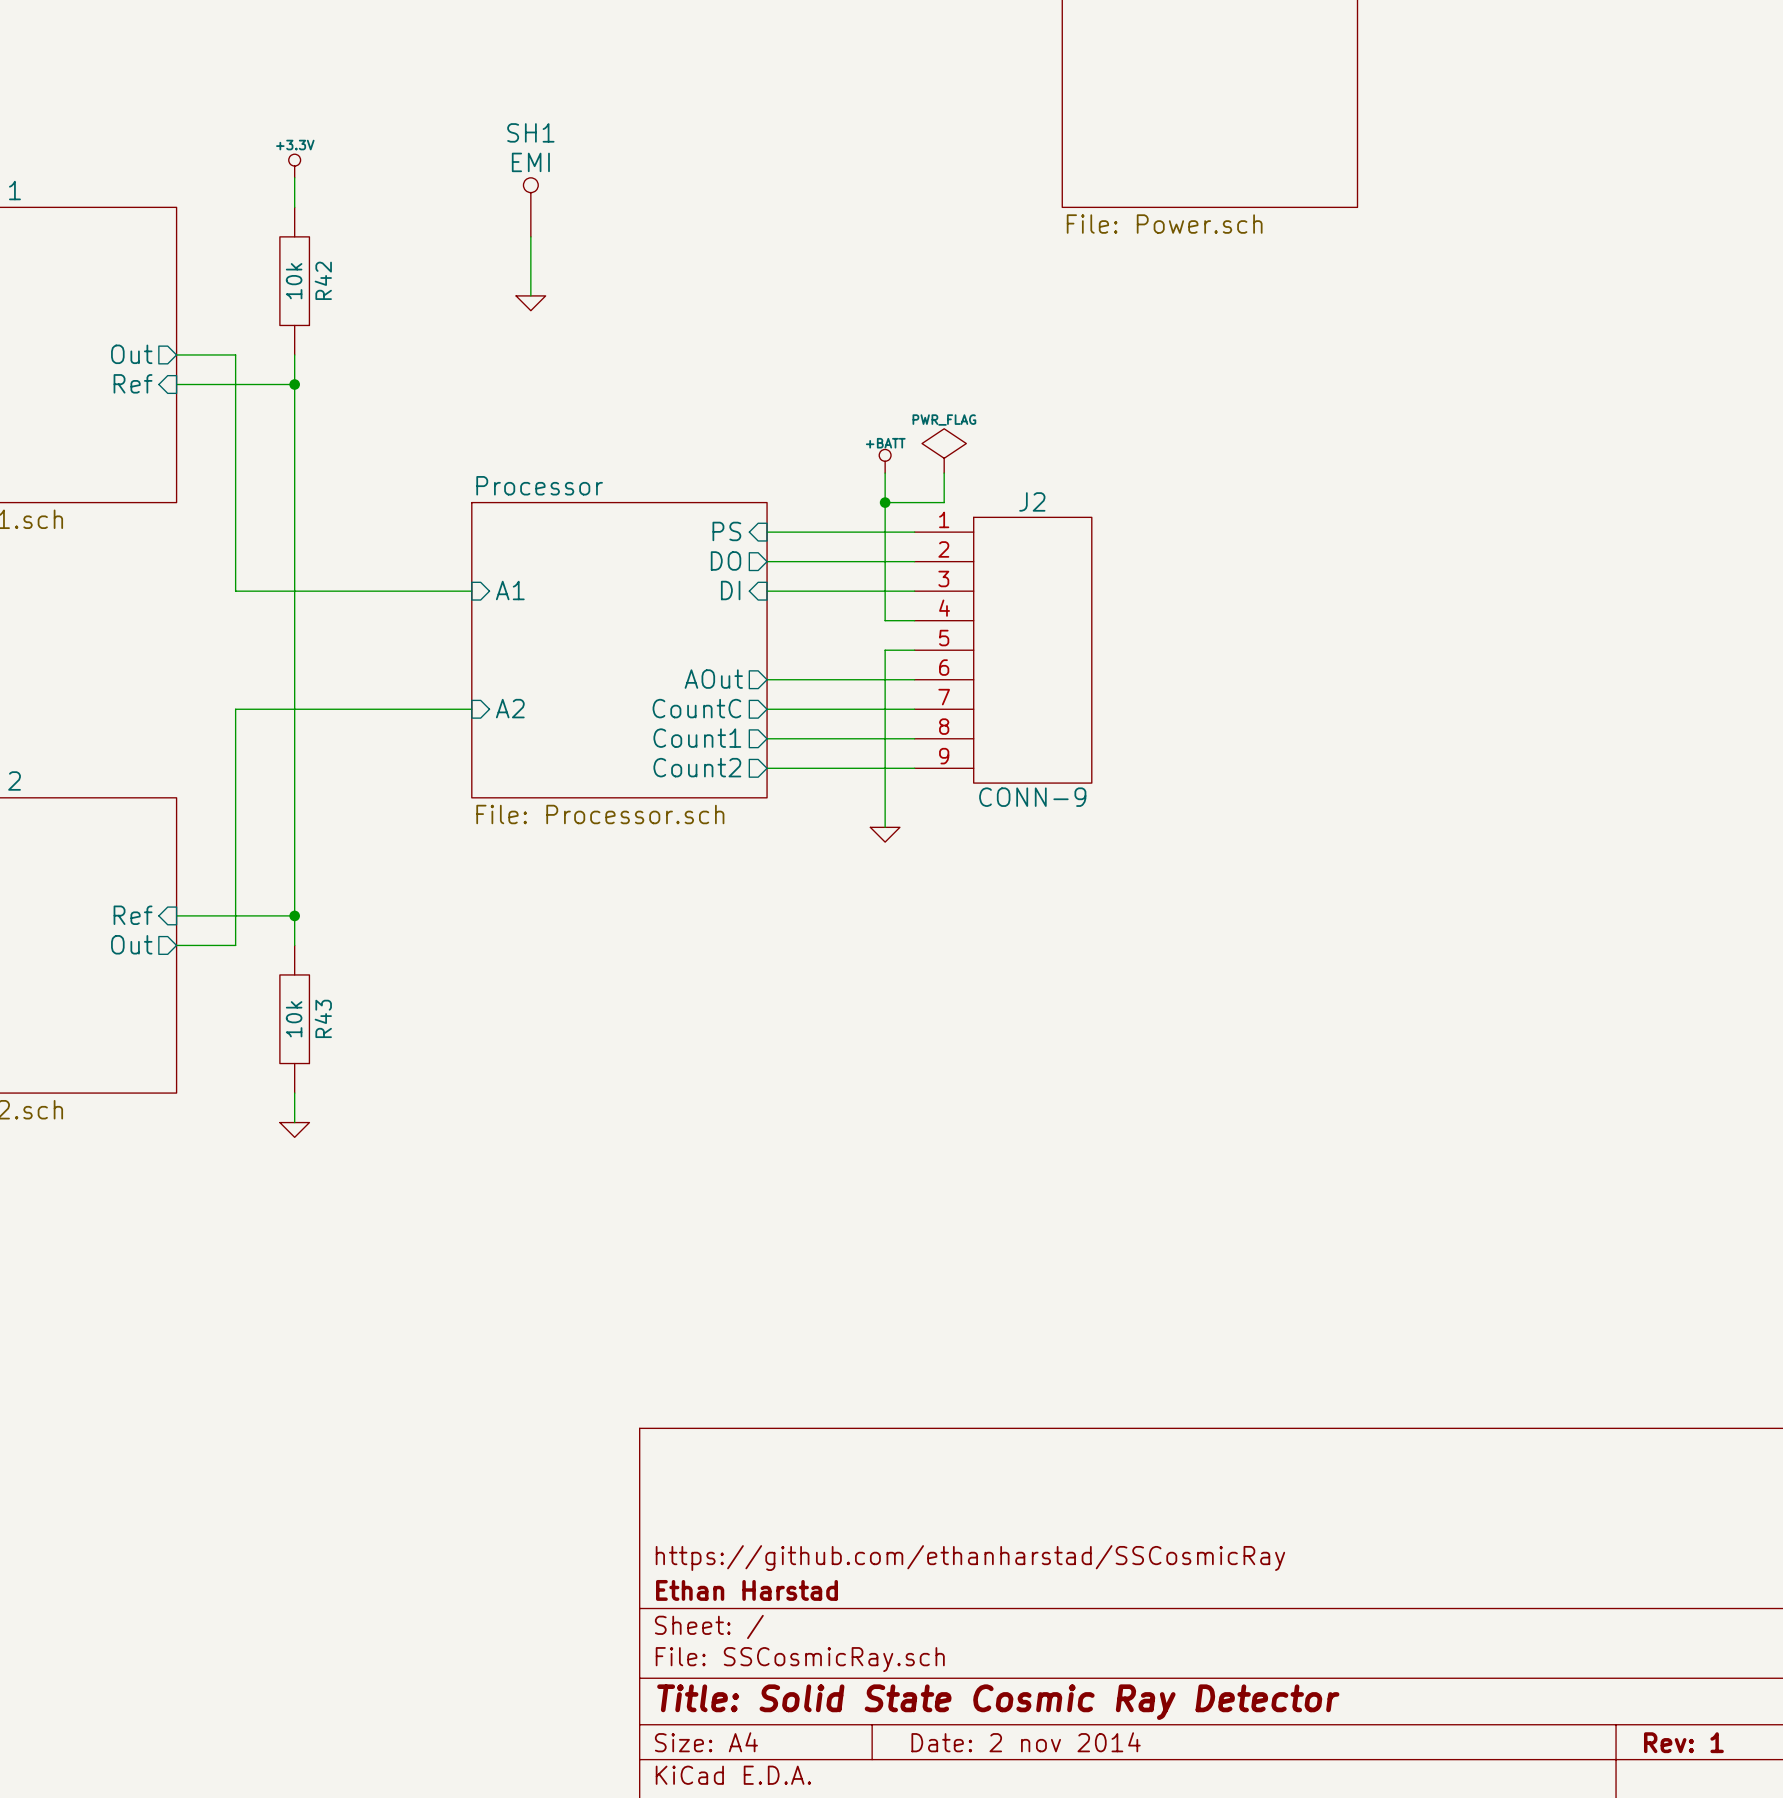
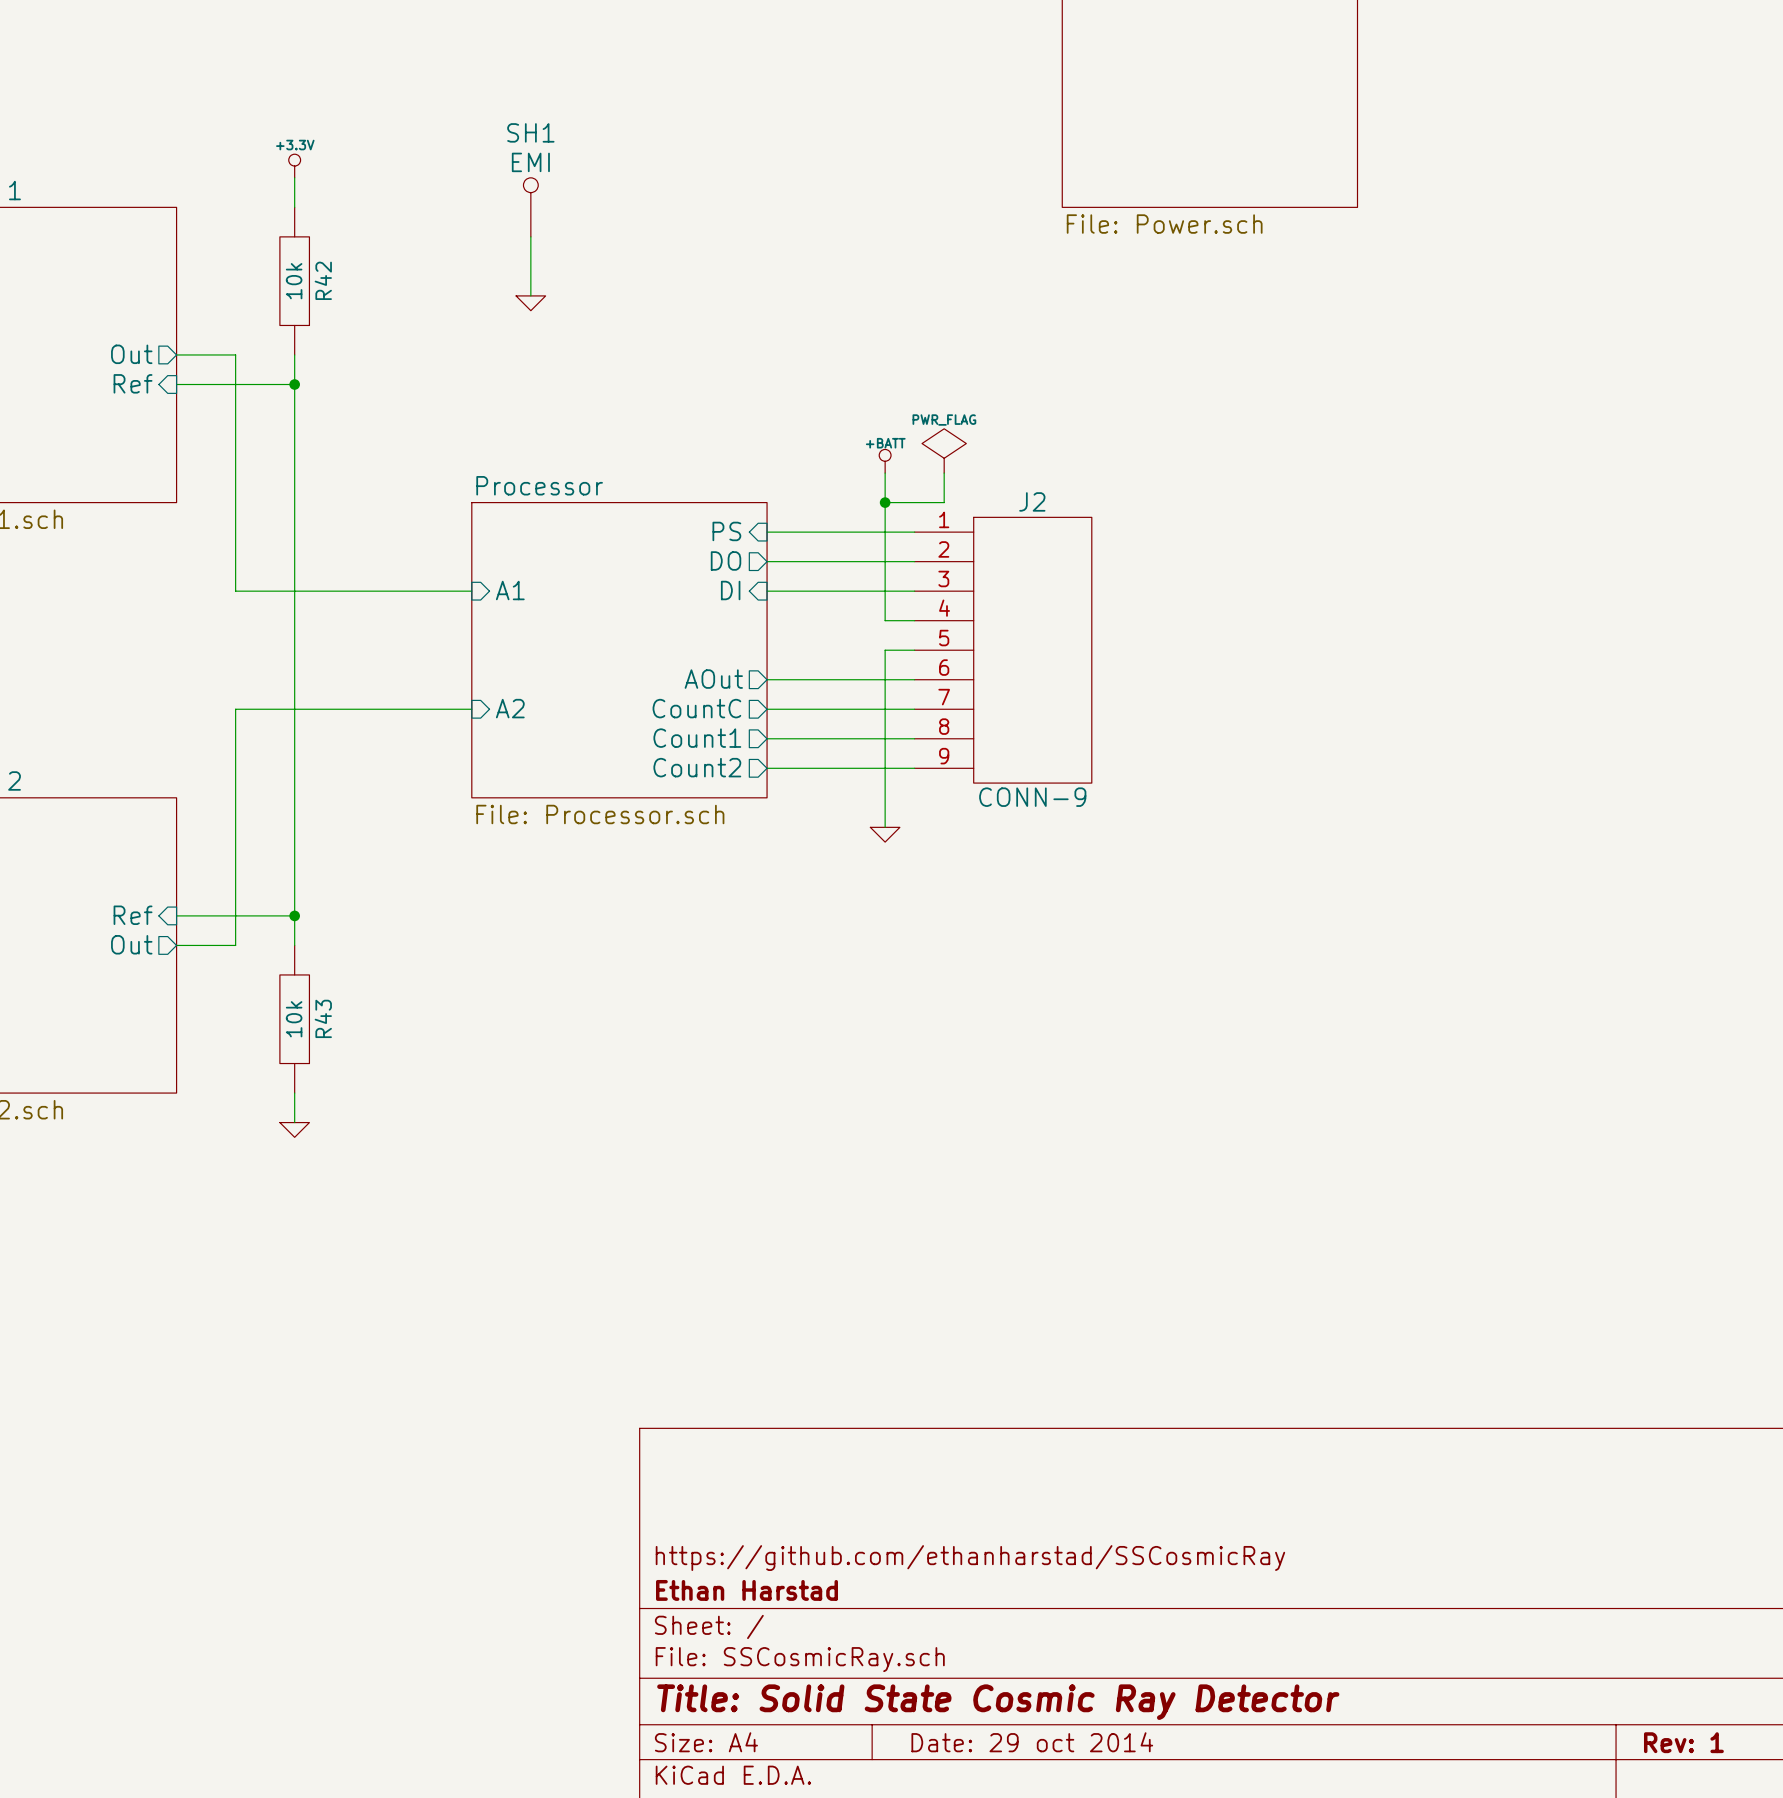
title block: Date: 2 nov 2014 (1026, 1742) -> Date: 29 oct 2014 (1032, 1742)

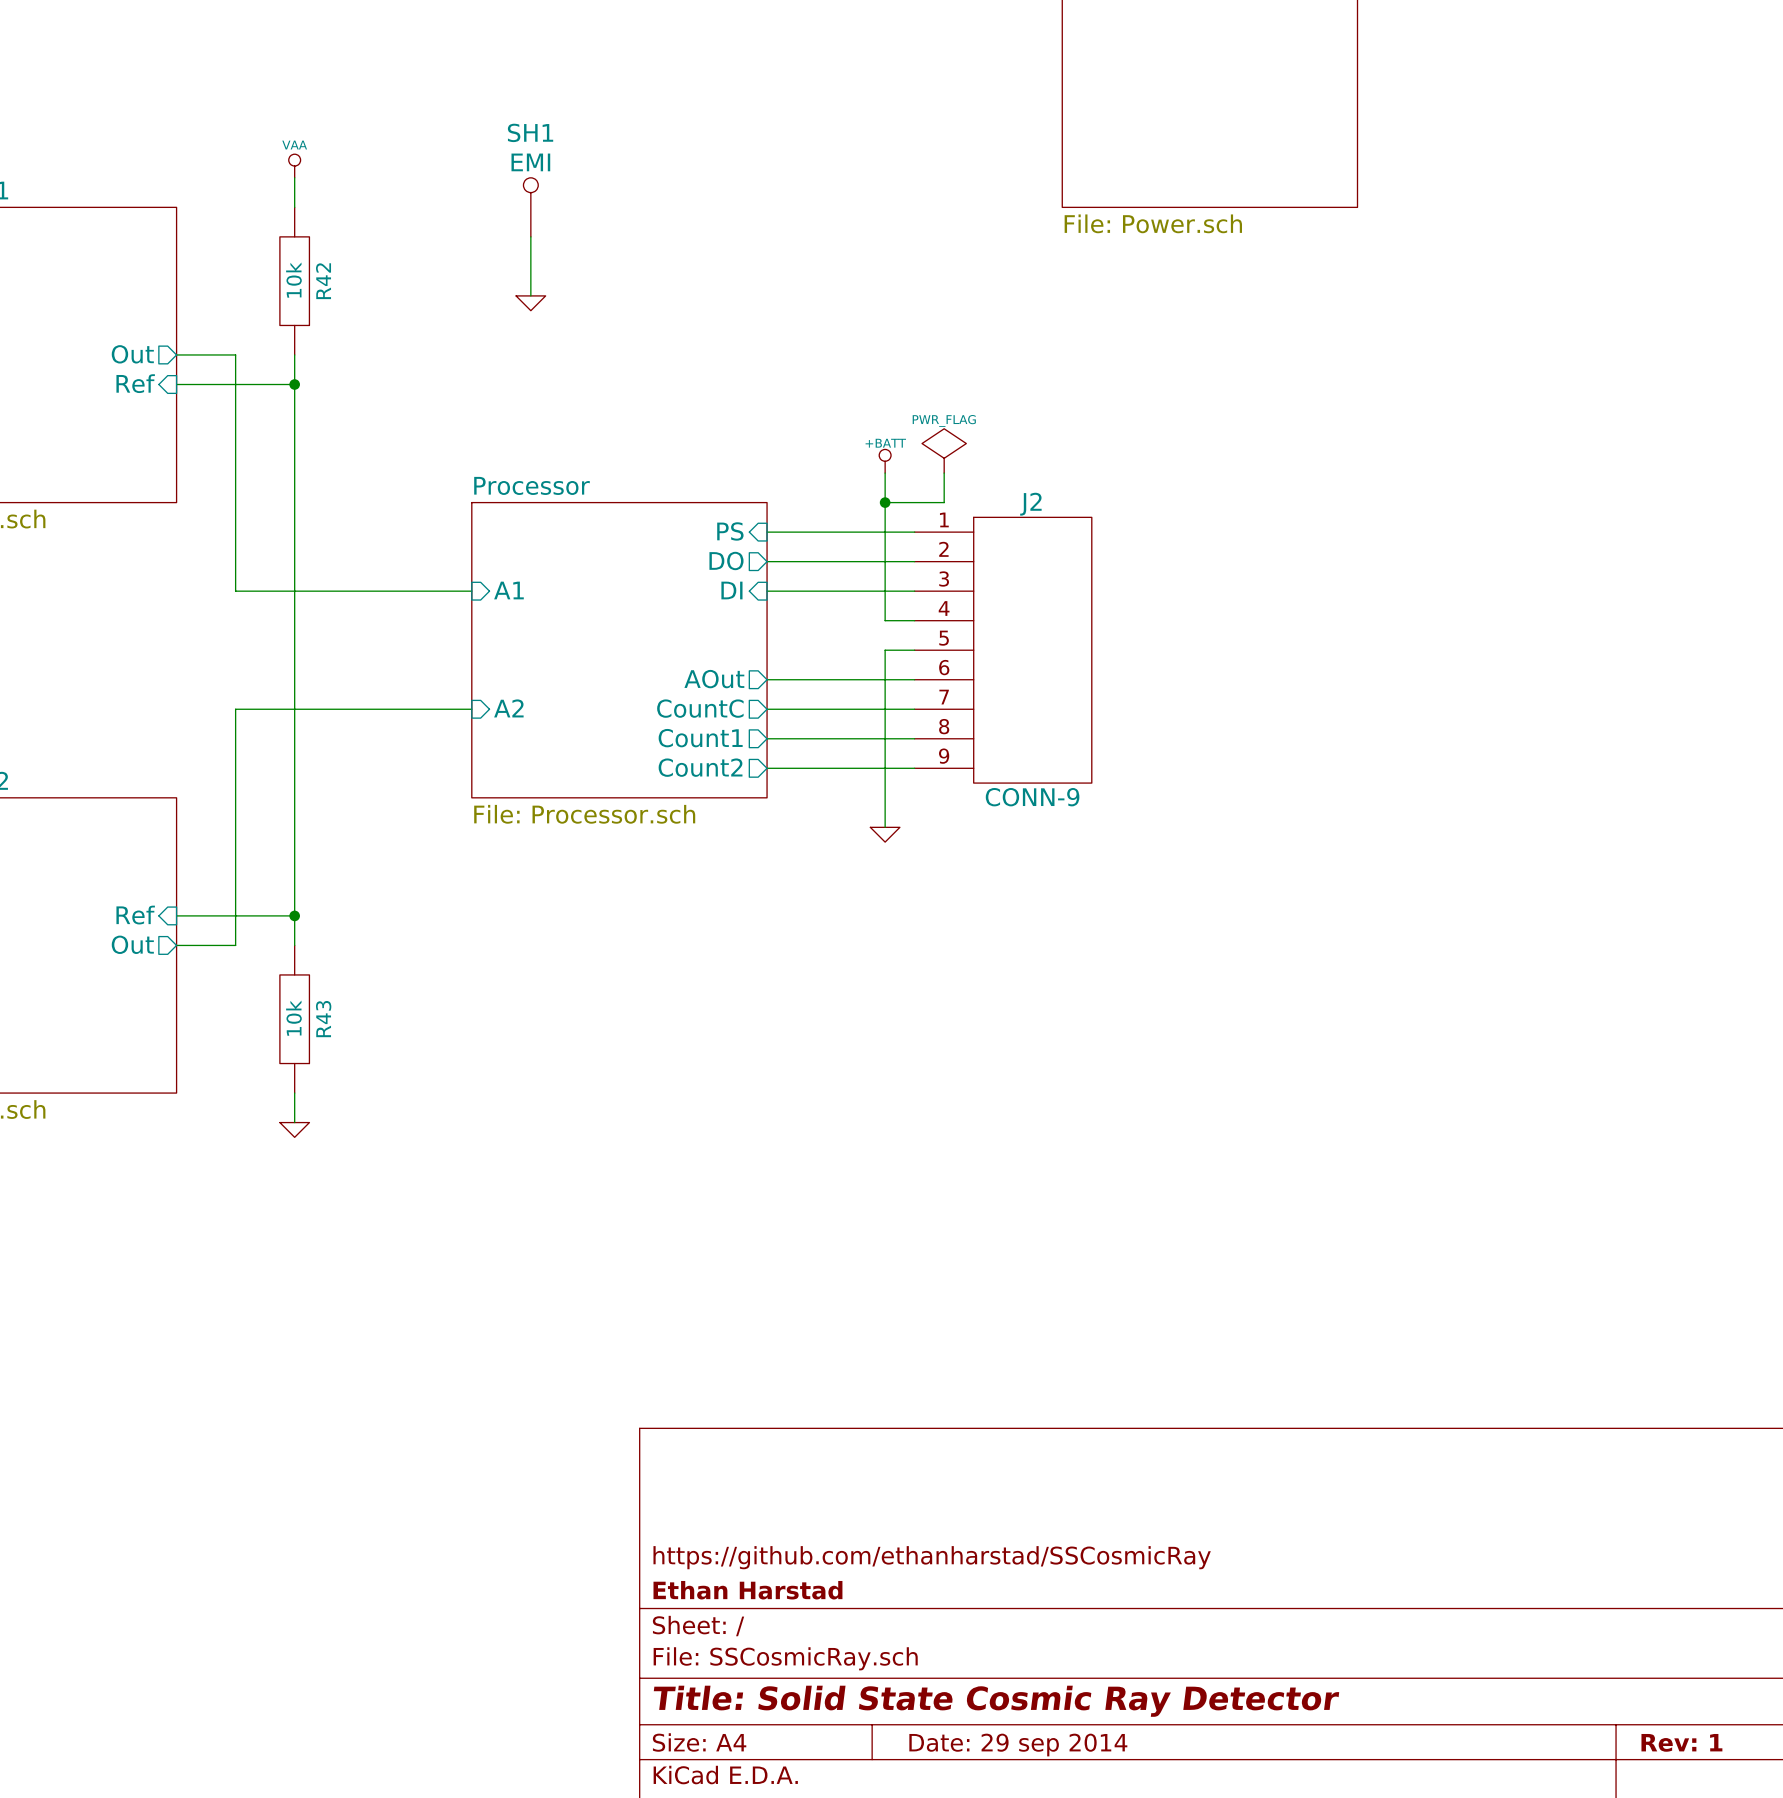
power symbol: +3.3V (294, 166) -> VAA (294, 166)
title block: Date: 29 oct 2014 (1032, 1742) -> Date: 29 sep 2014 (1018, 1745)

